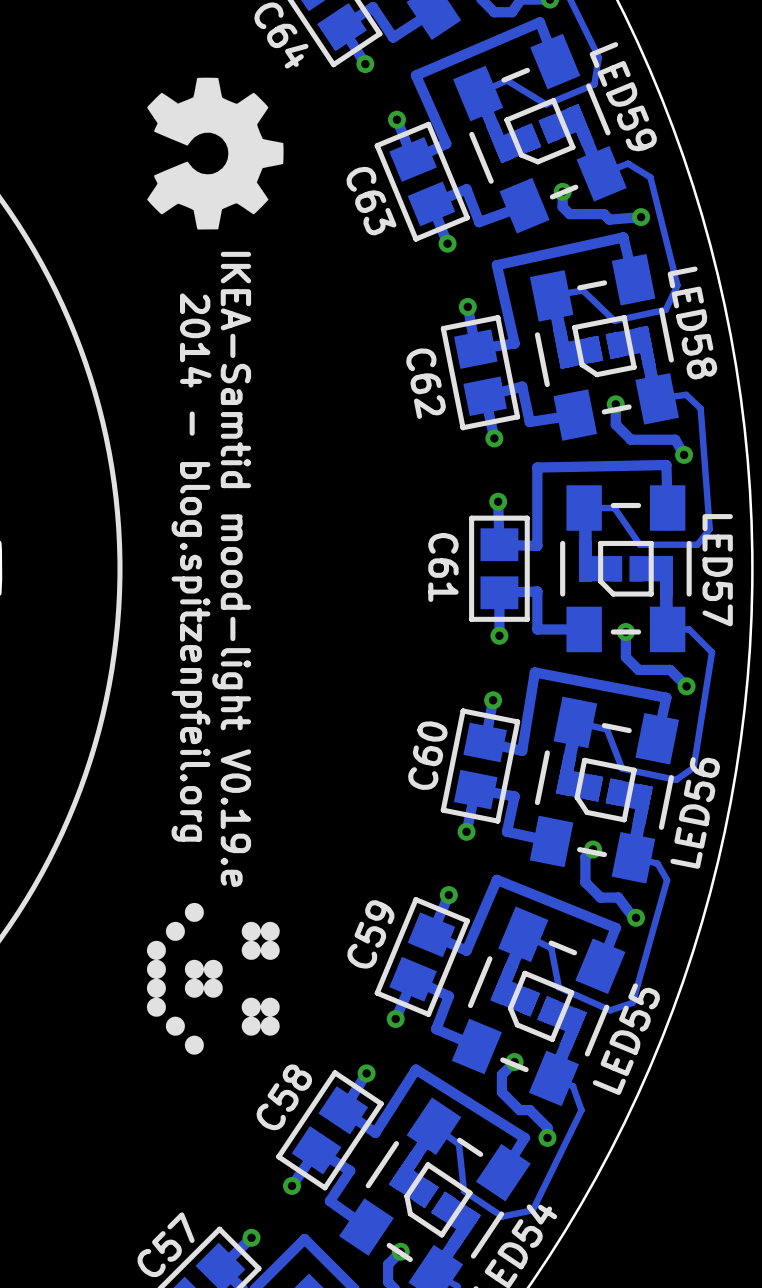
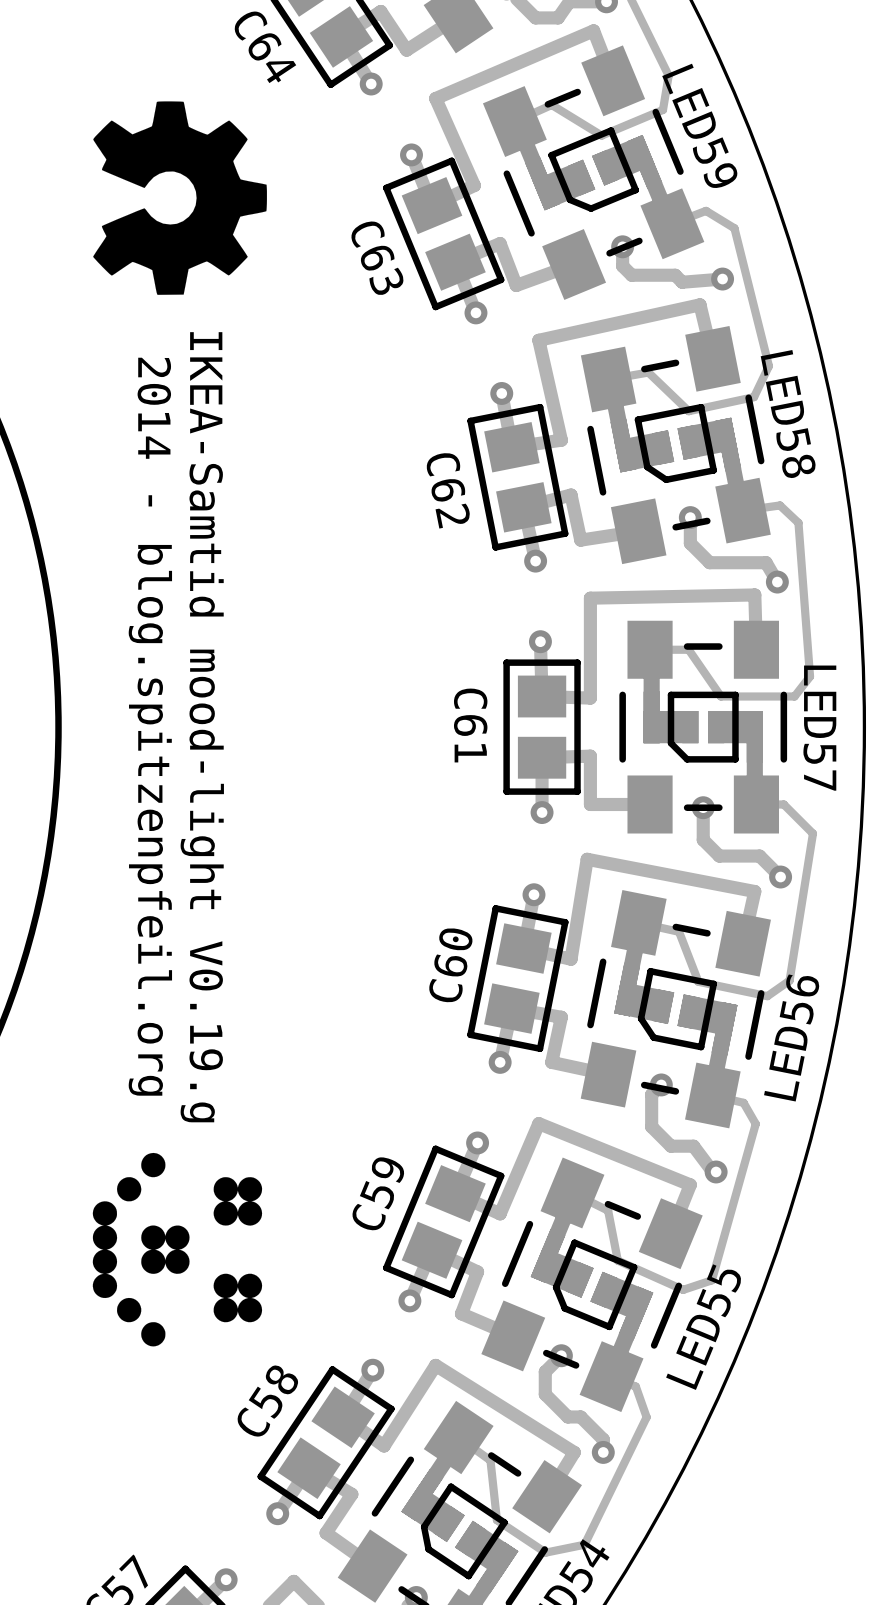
text: IKEA-Samtid mood-light V0.19.e (231, 569) -> IKEA-Samtid mood-light V0.19.g (202, 727)

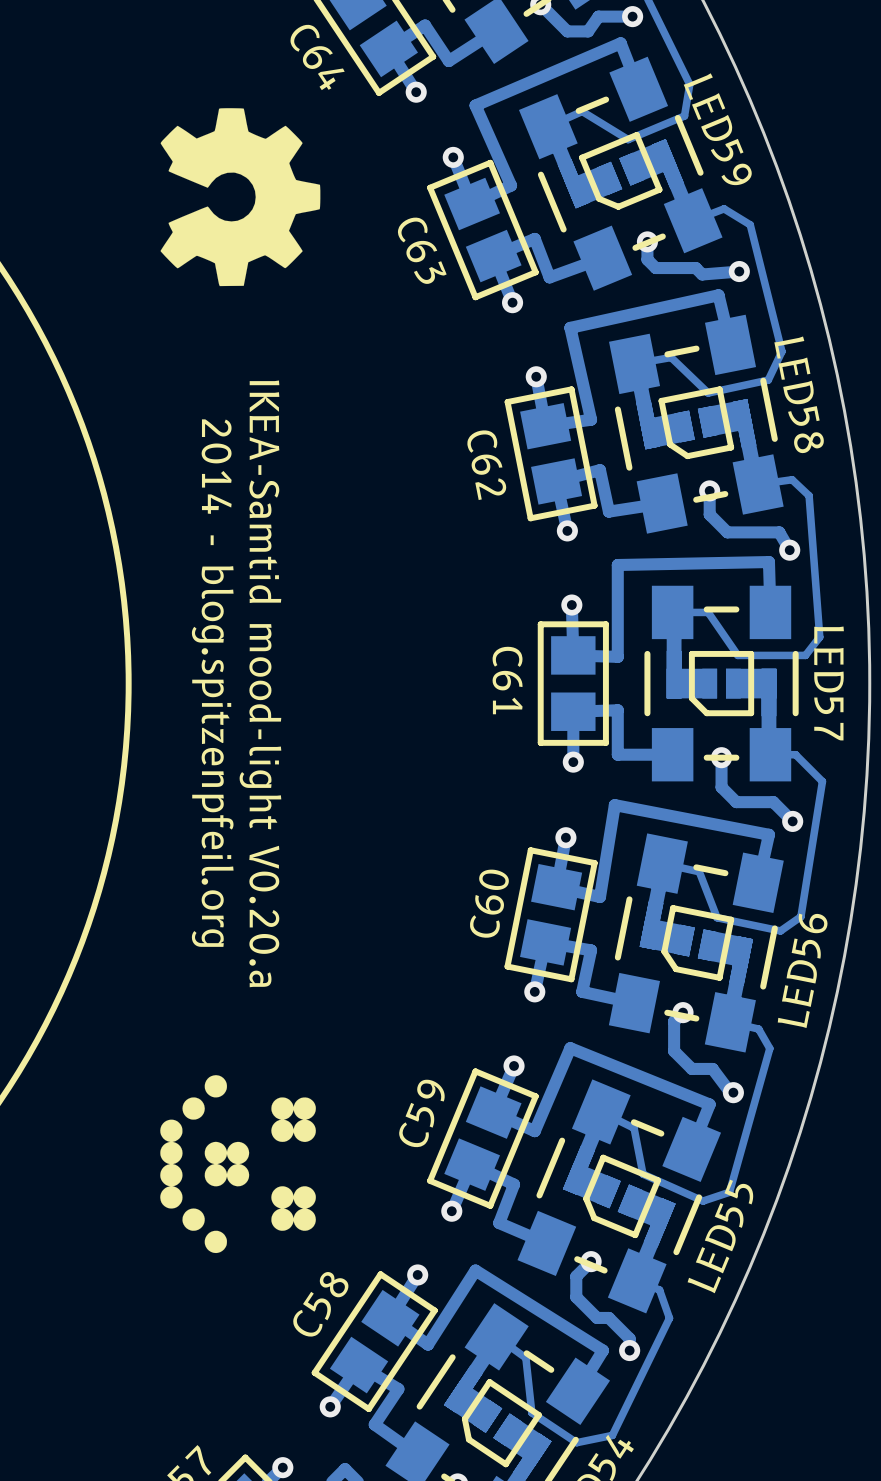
text: IKEA-Samtid mood-light V0.19.g (202, 727) -> IKEA-Samtid mood-light V0.20.a (260, 683)

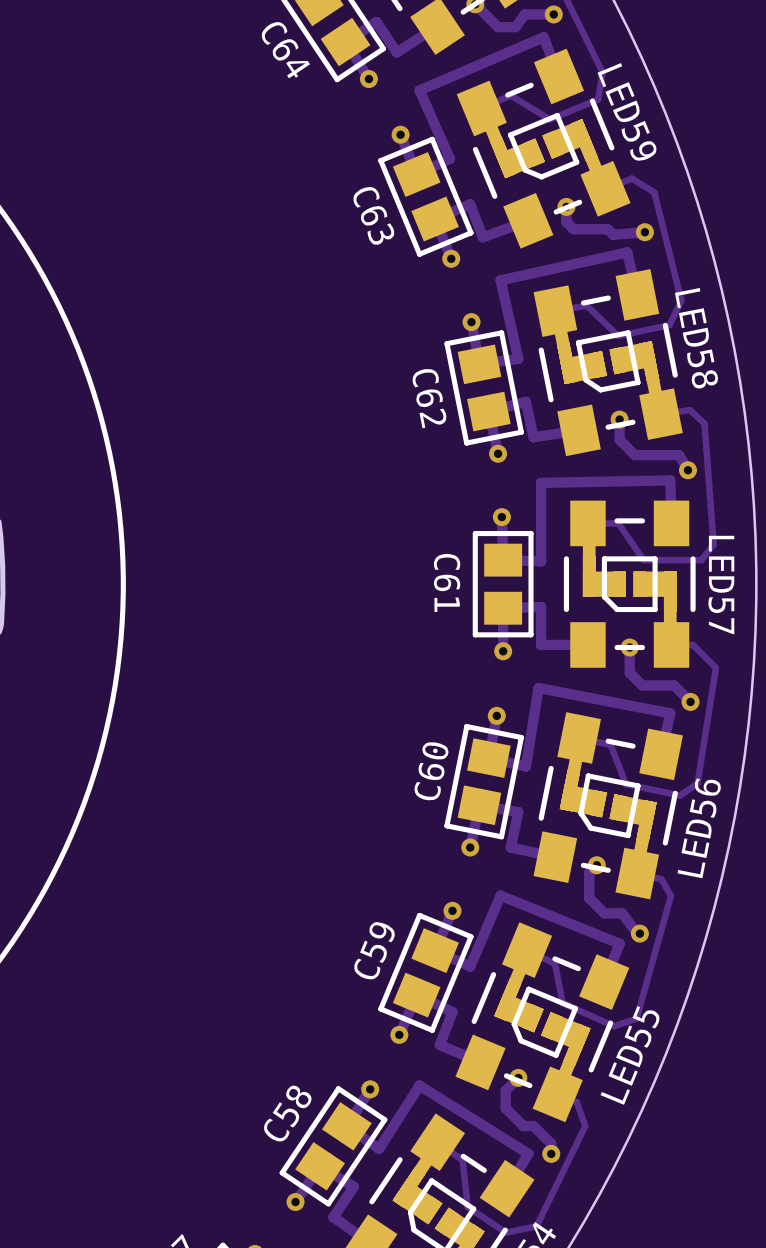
drawing: [160, 108, 321, 287] -> none
text: 2014 - blog.spitzenpfeil.org (212, 683) -> none
text: IKEA-Samtid mood-light V0.20.a (260, 683) -> none
drawing: [160, 1075, 316, 1254] -> none

